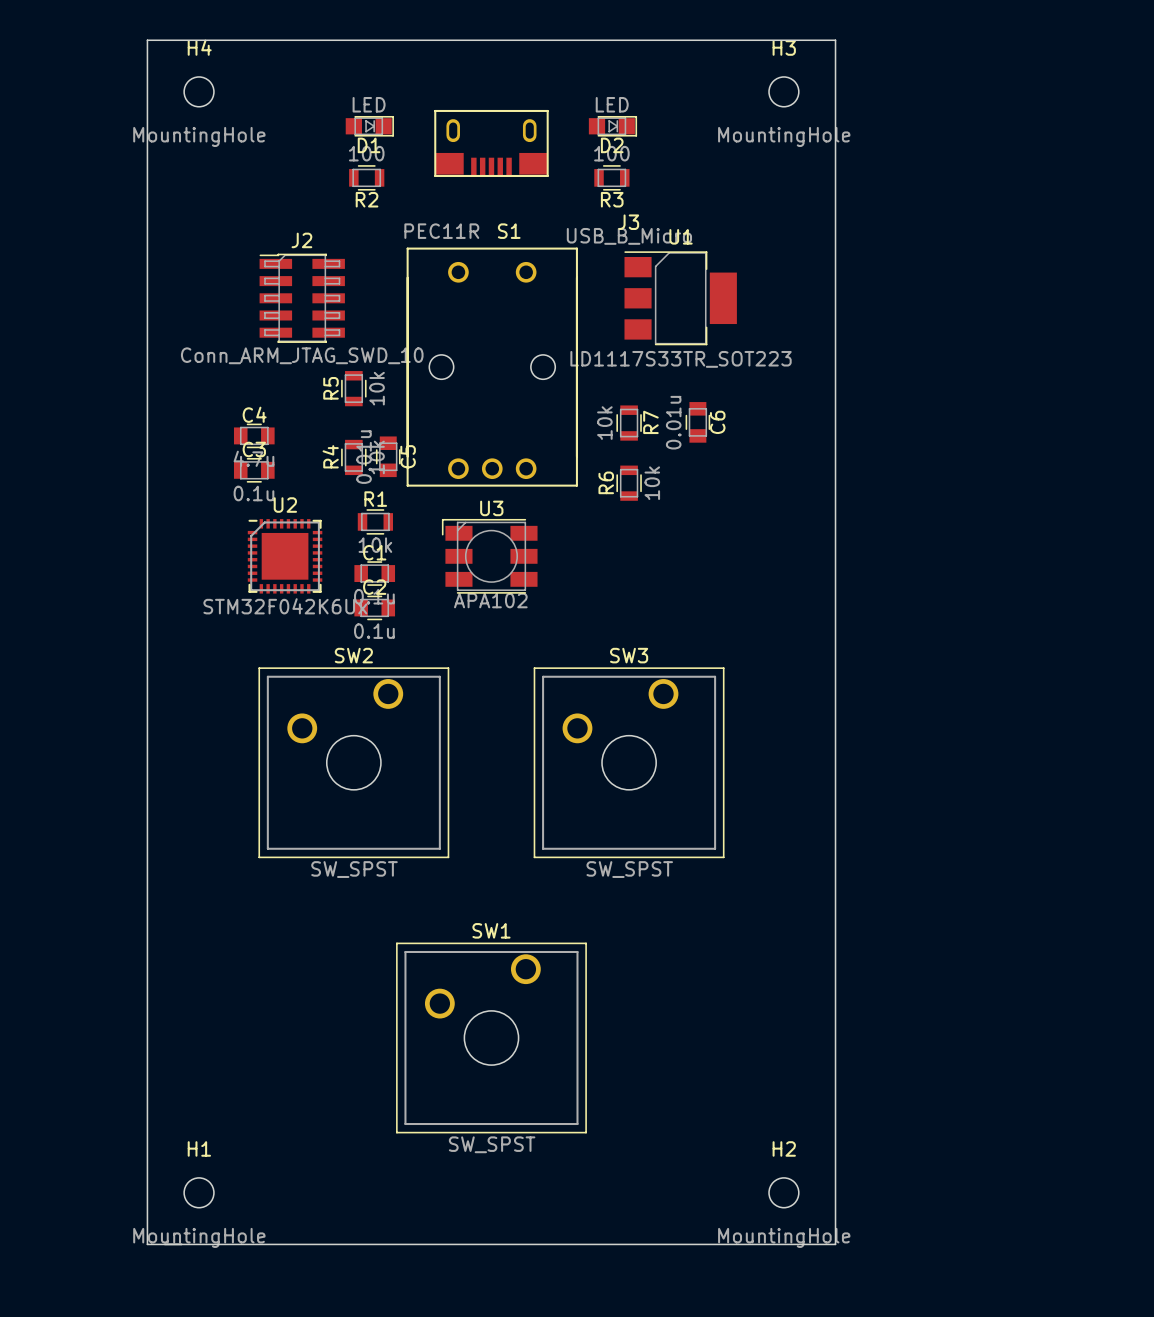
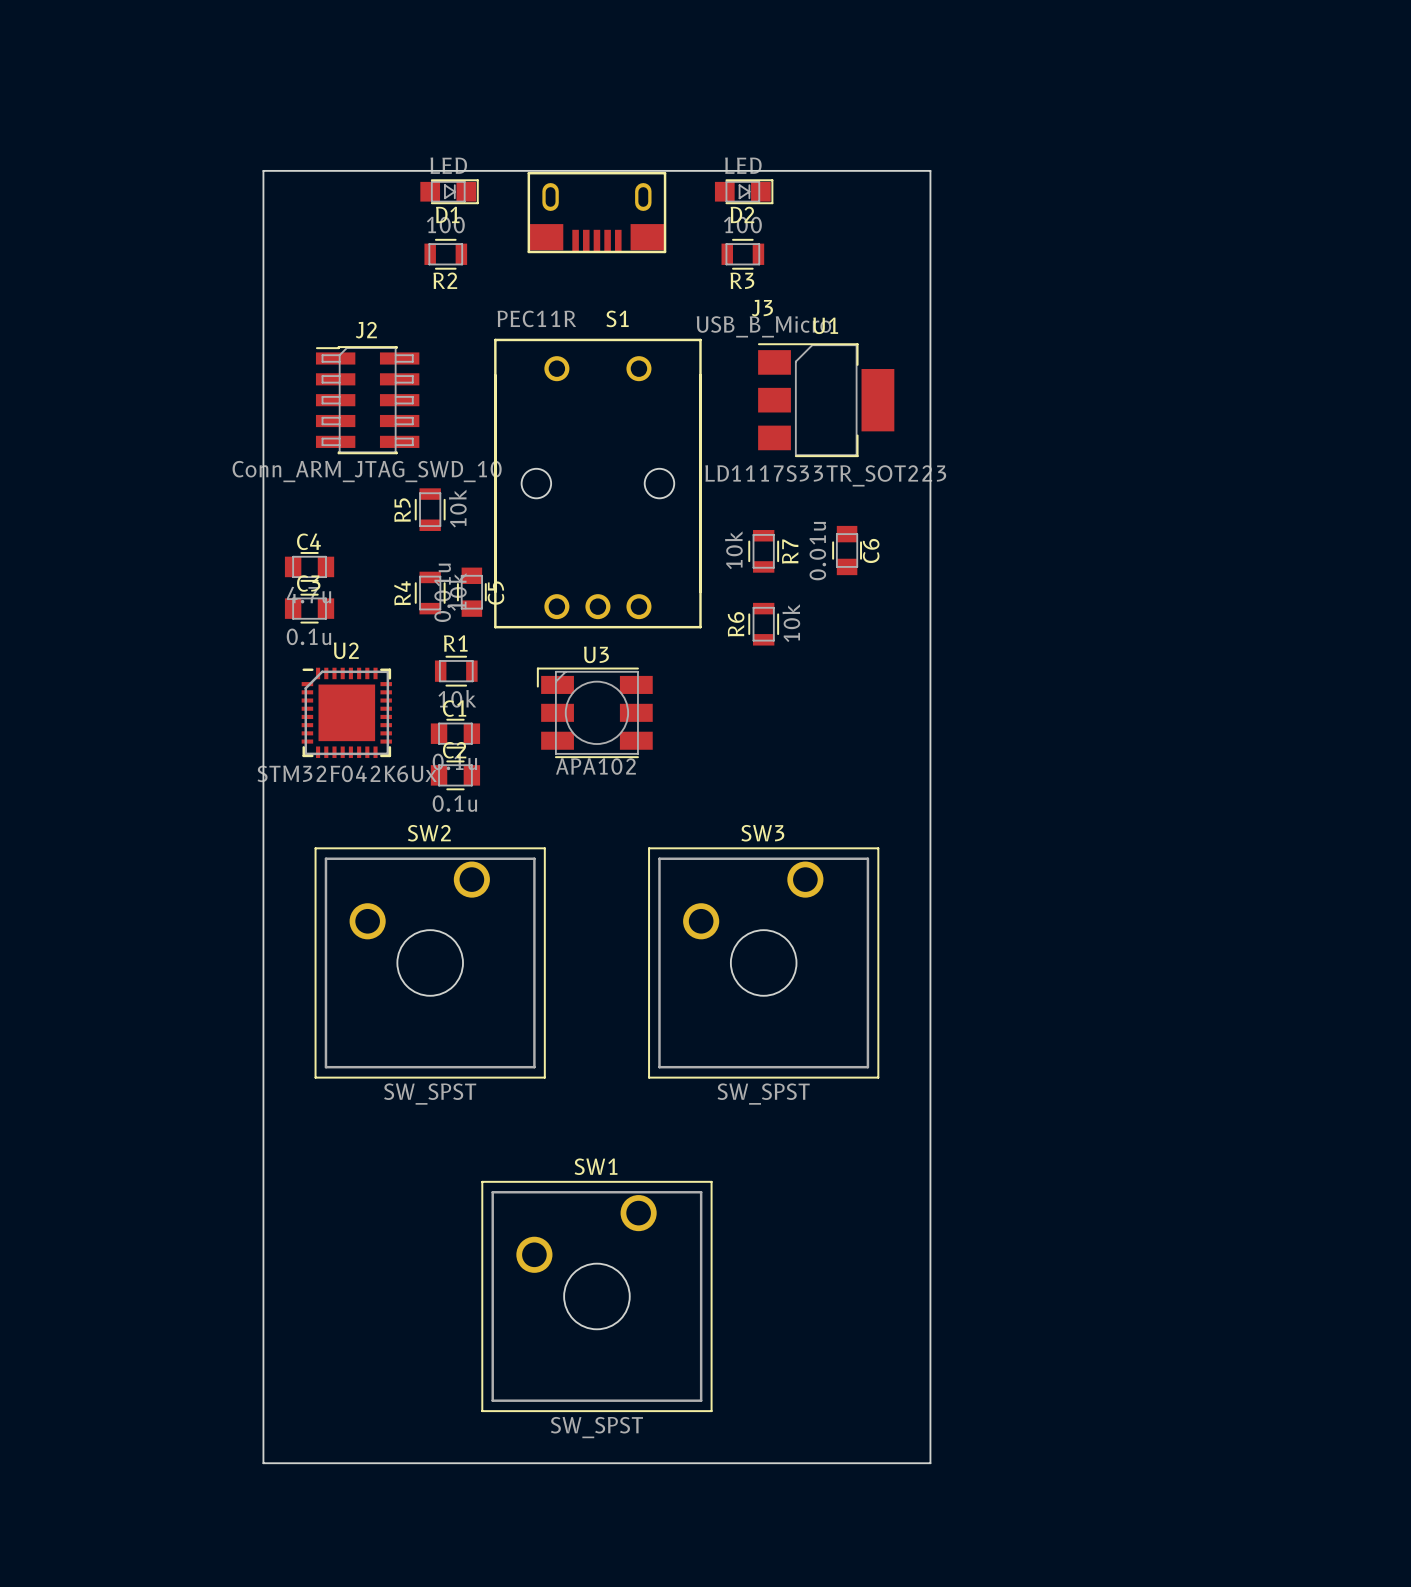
board edge: (147, 40) (147, 1244) (835, 1244) (835, 40) (147, 40) -> (263, 170) (263, 1463) (930, 1463) (930, 170) (263, 170)
H4: MountingHole (199, 91) -> none
H3: MountingHole (783, 91) -> none
H1: MountingHole (199, 1192) -> none
H2: MountingHole (783, 1192) -> none

